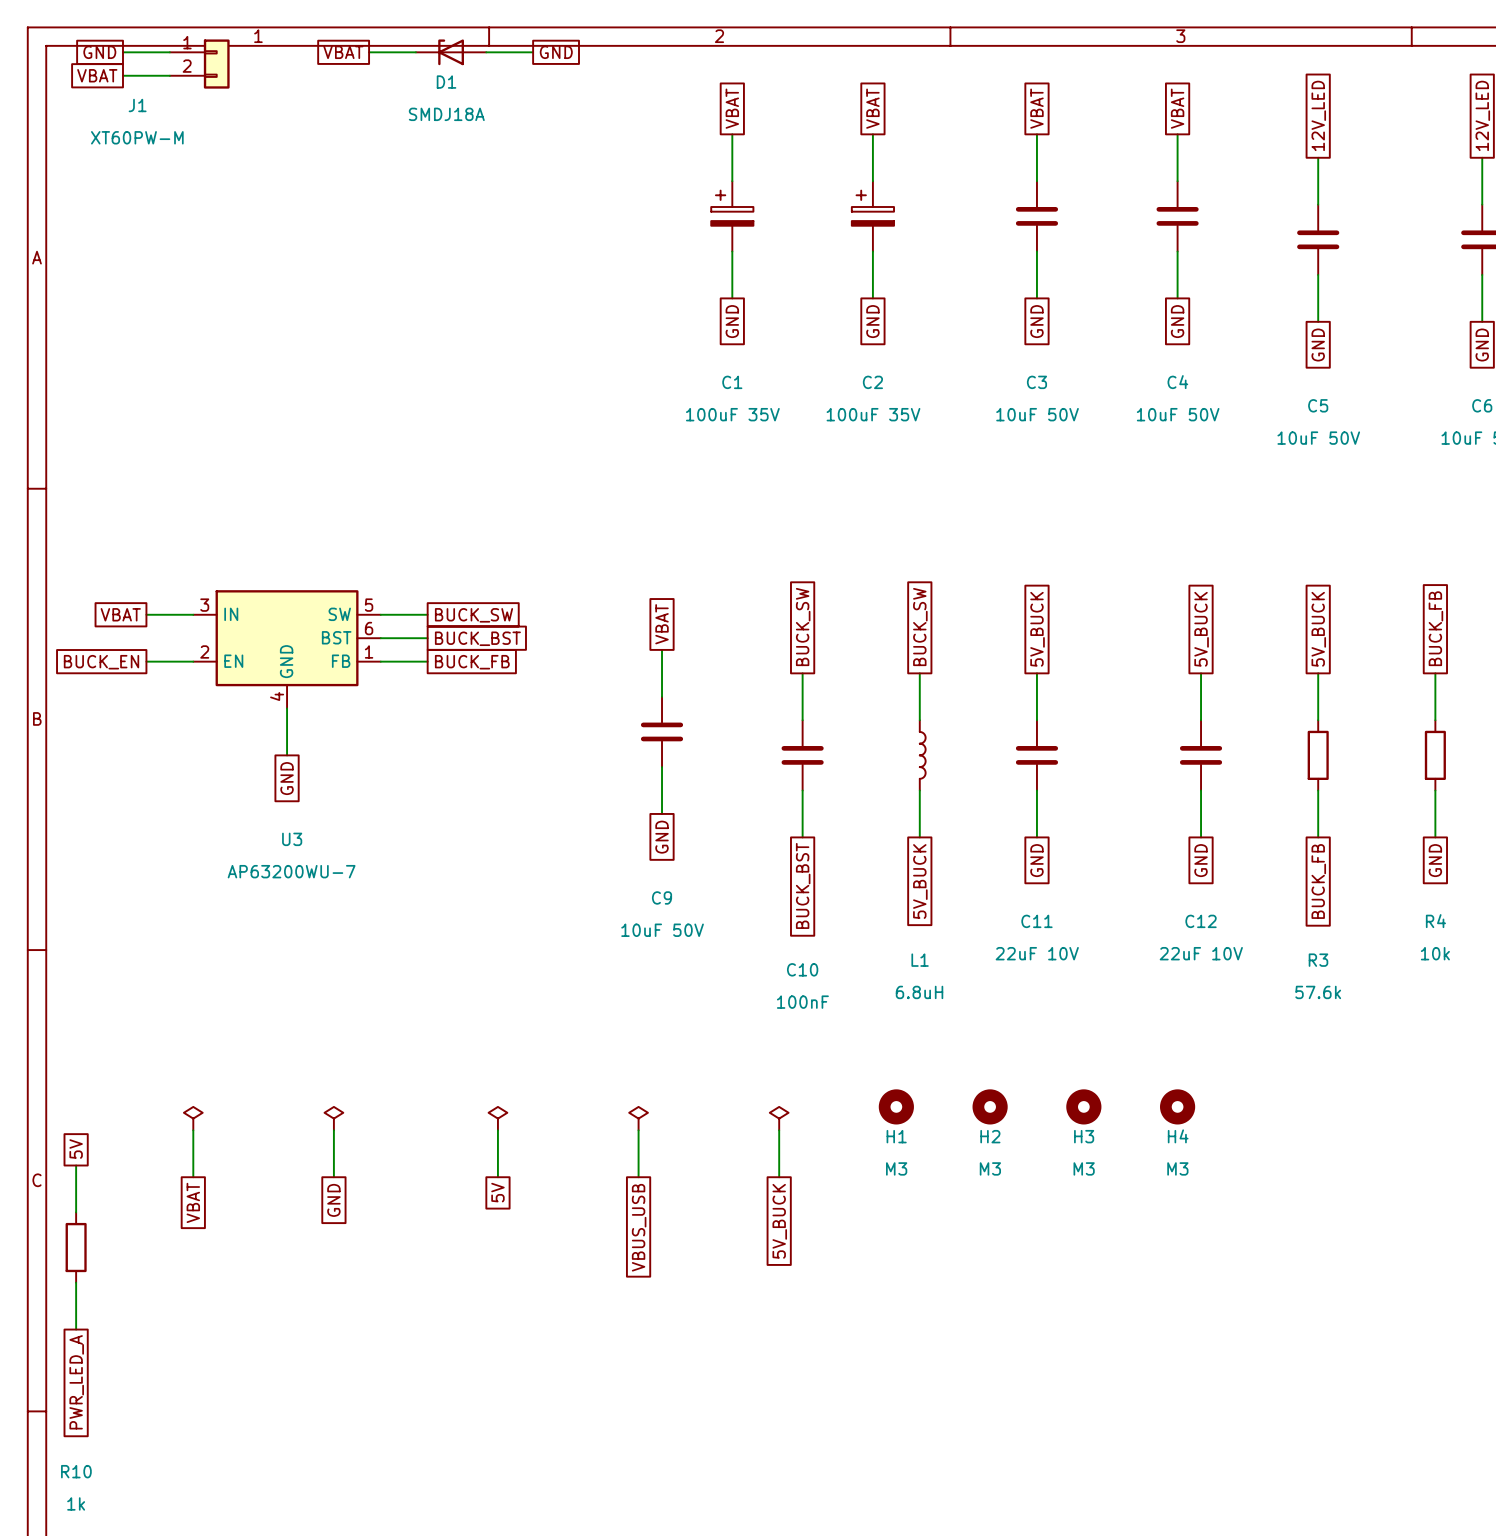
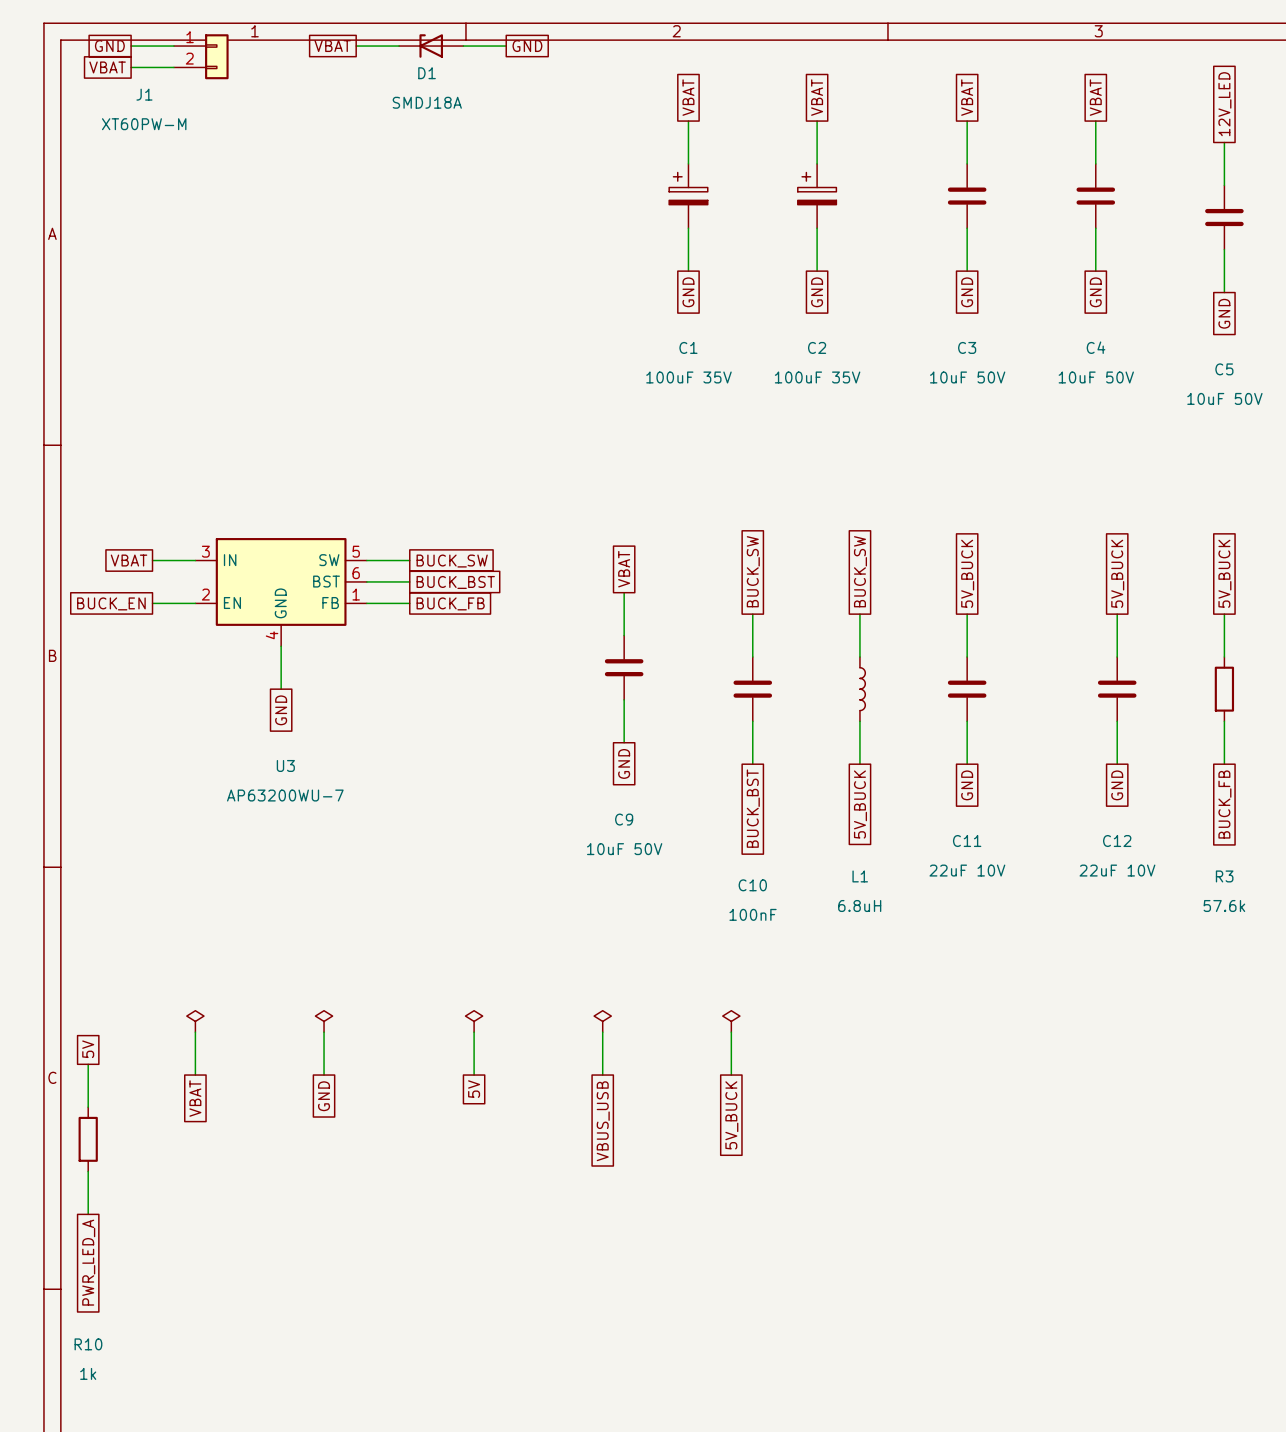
H1: M3 (896, 1106) -> none
H2: M3 (990, 1106) -> none
H3: M3 (1083, 1106) -> none
H4: M3 (1177, 1106) -> none

